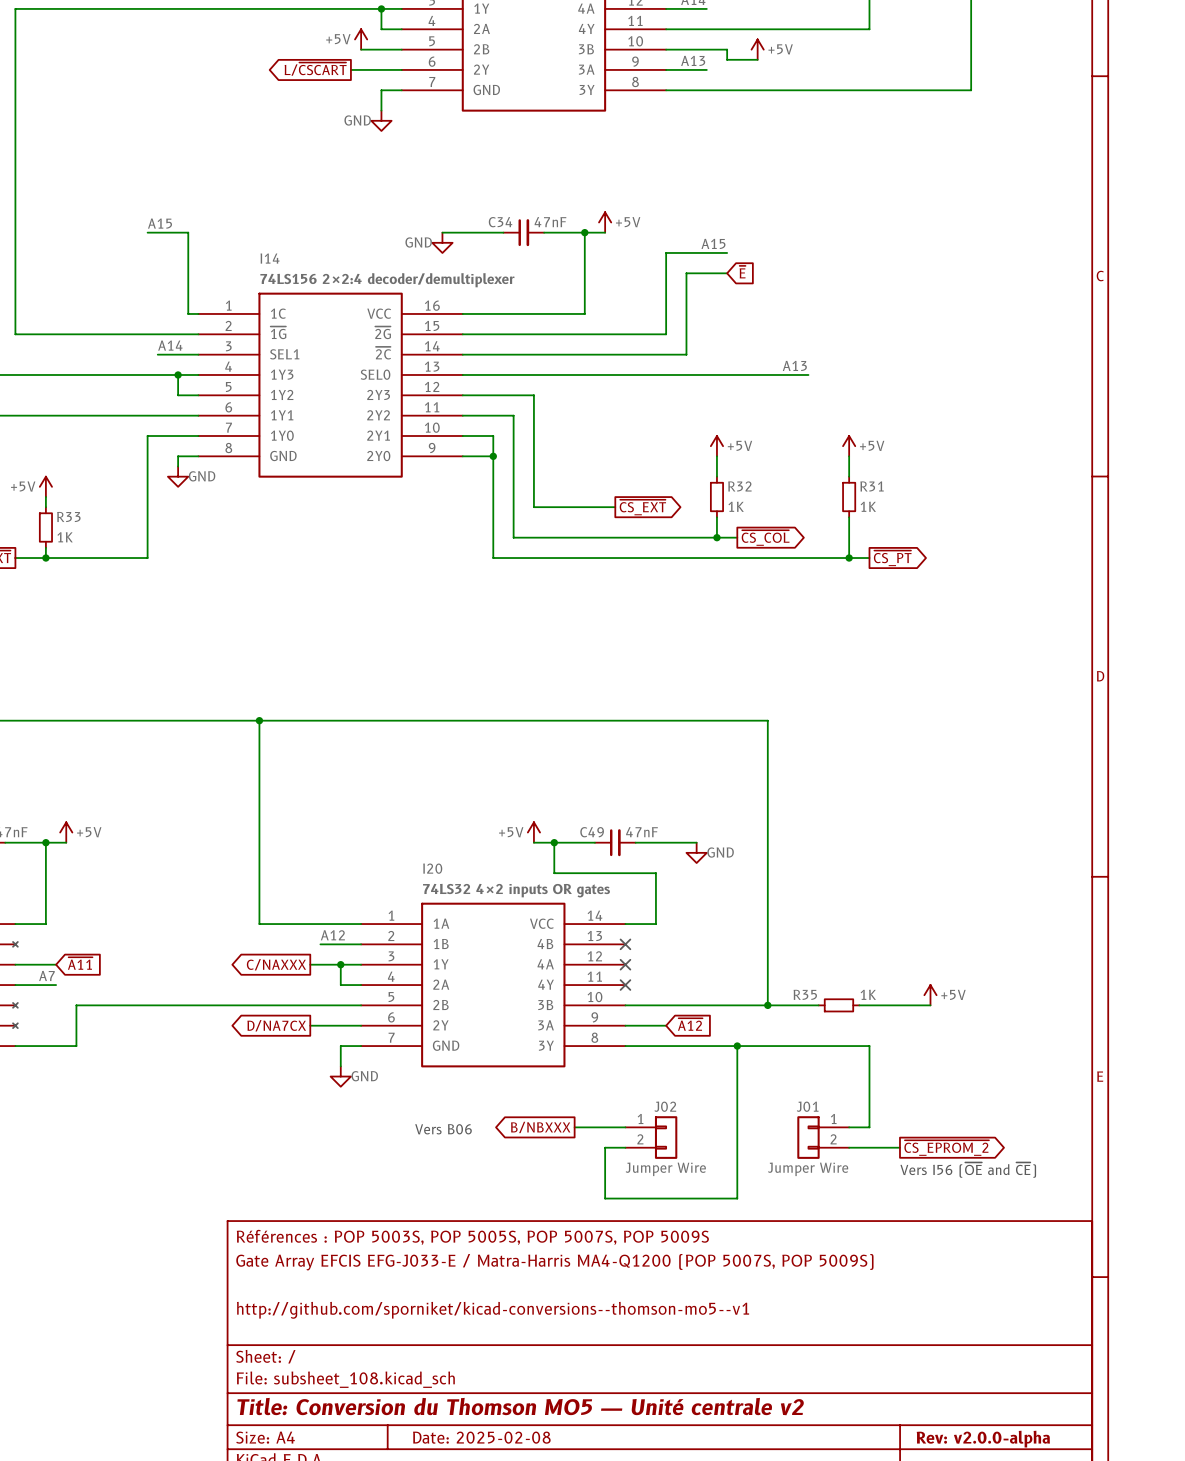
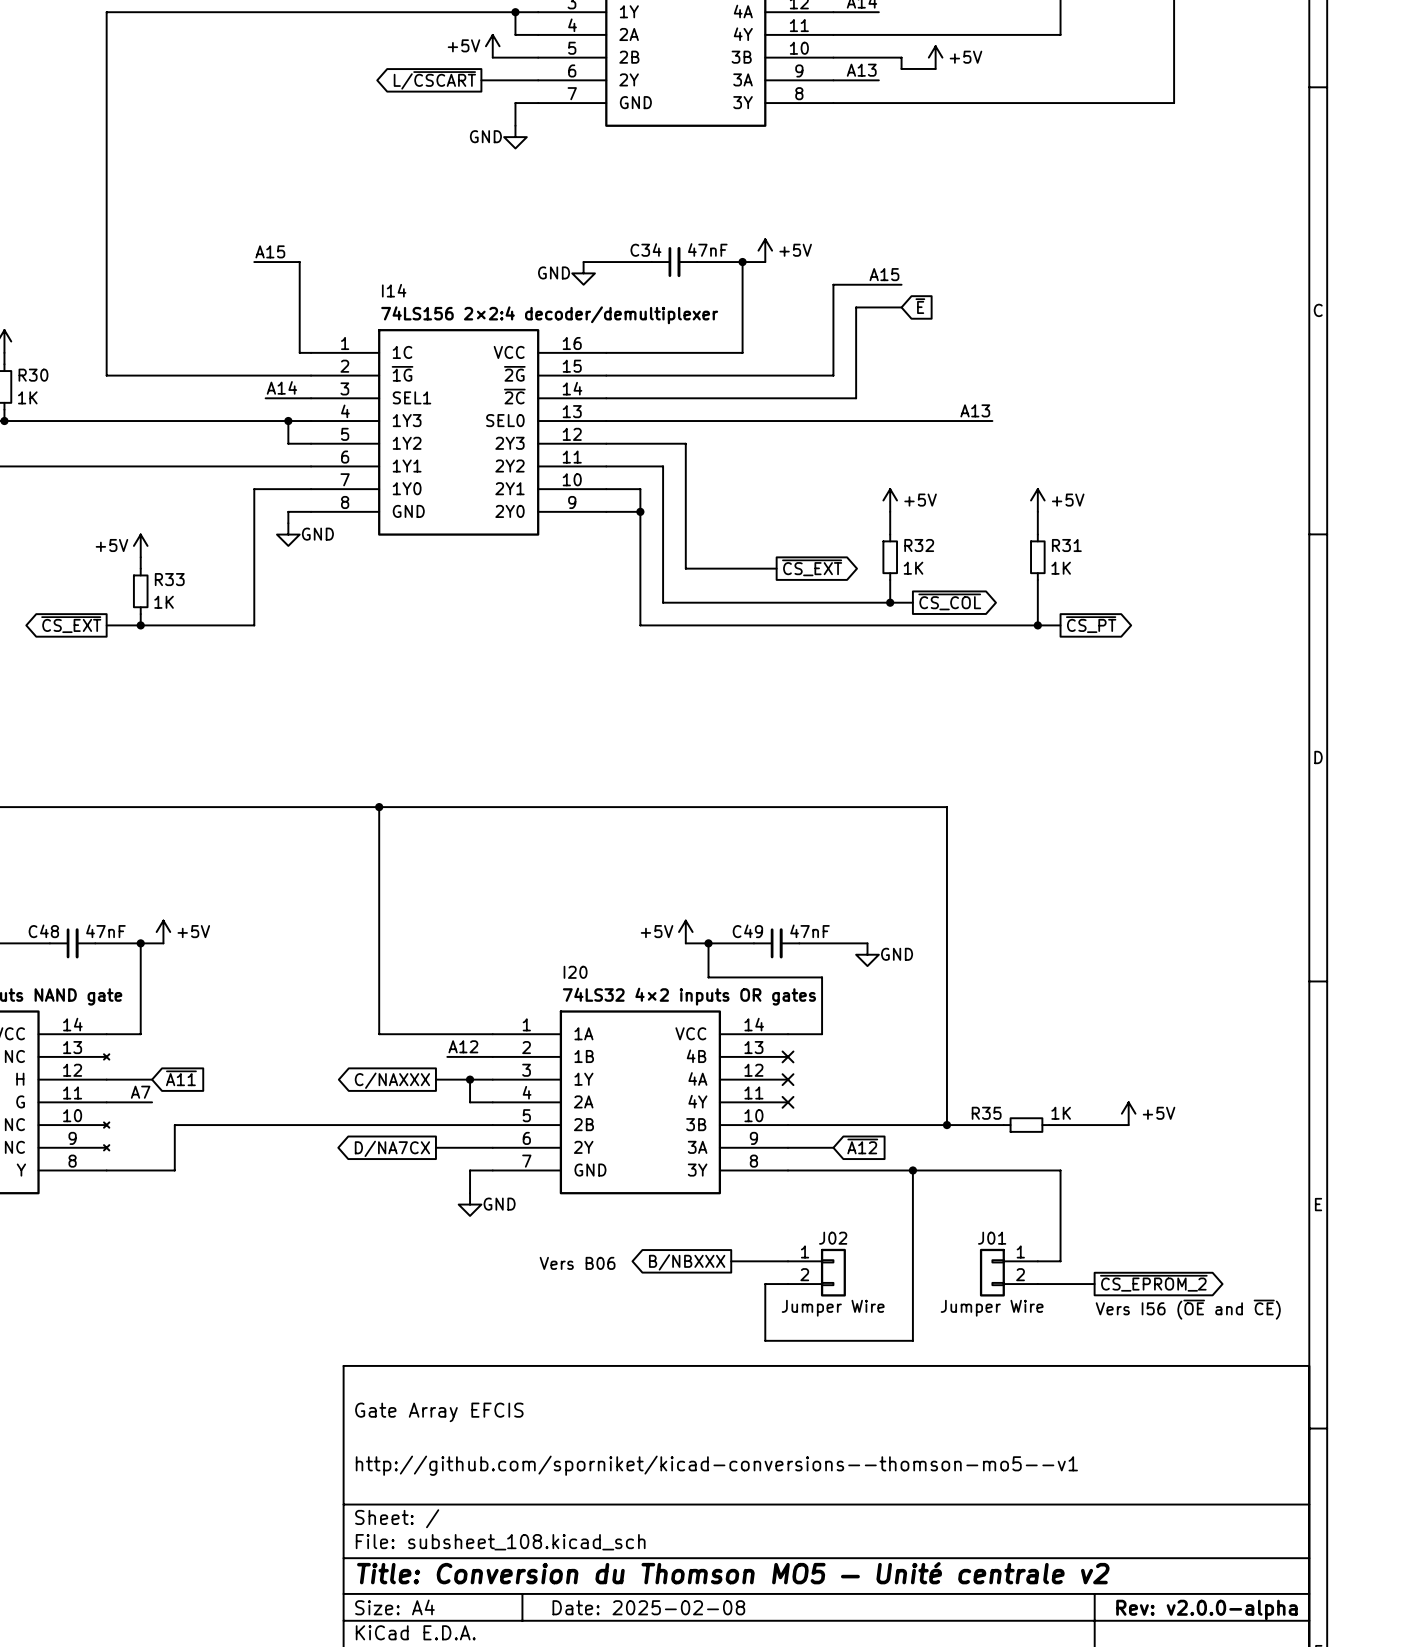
title block: Références : POP 5003S, POP 5005S, POP 5007S, POP 5009S (472, 1237) -> none
title block: Gate Array EFCIS EFG-J033-E / Matra-Harris MA4-Q1200 (POP 5007S, POP 5009S) (554, 1262) -> Gate Array EFCIS (439, 1412)

